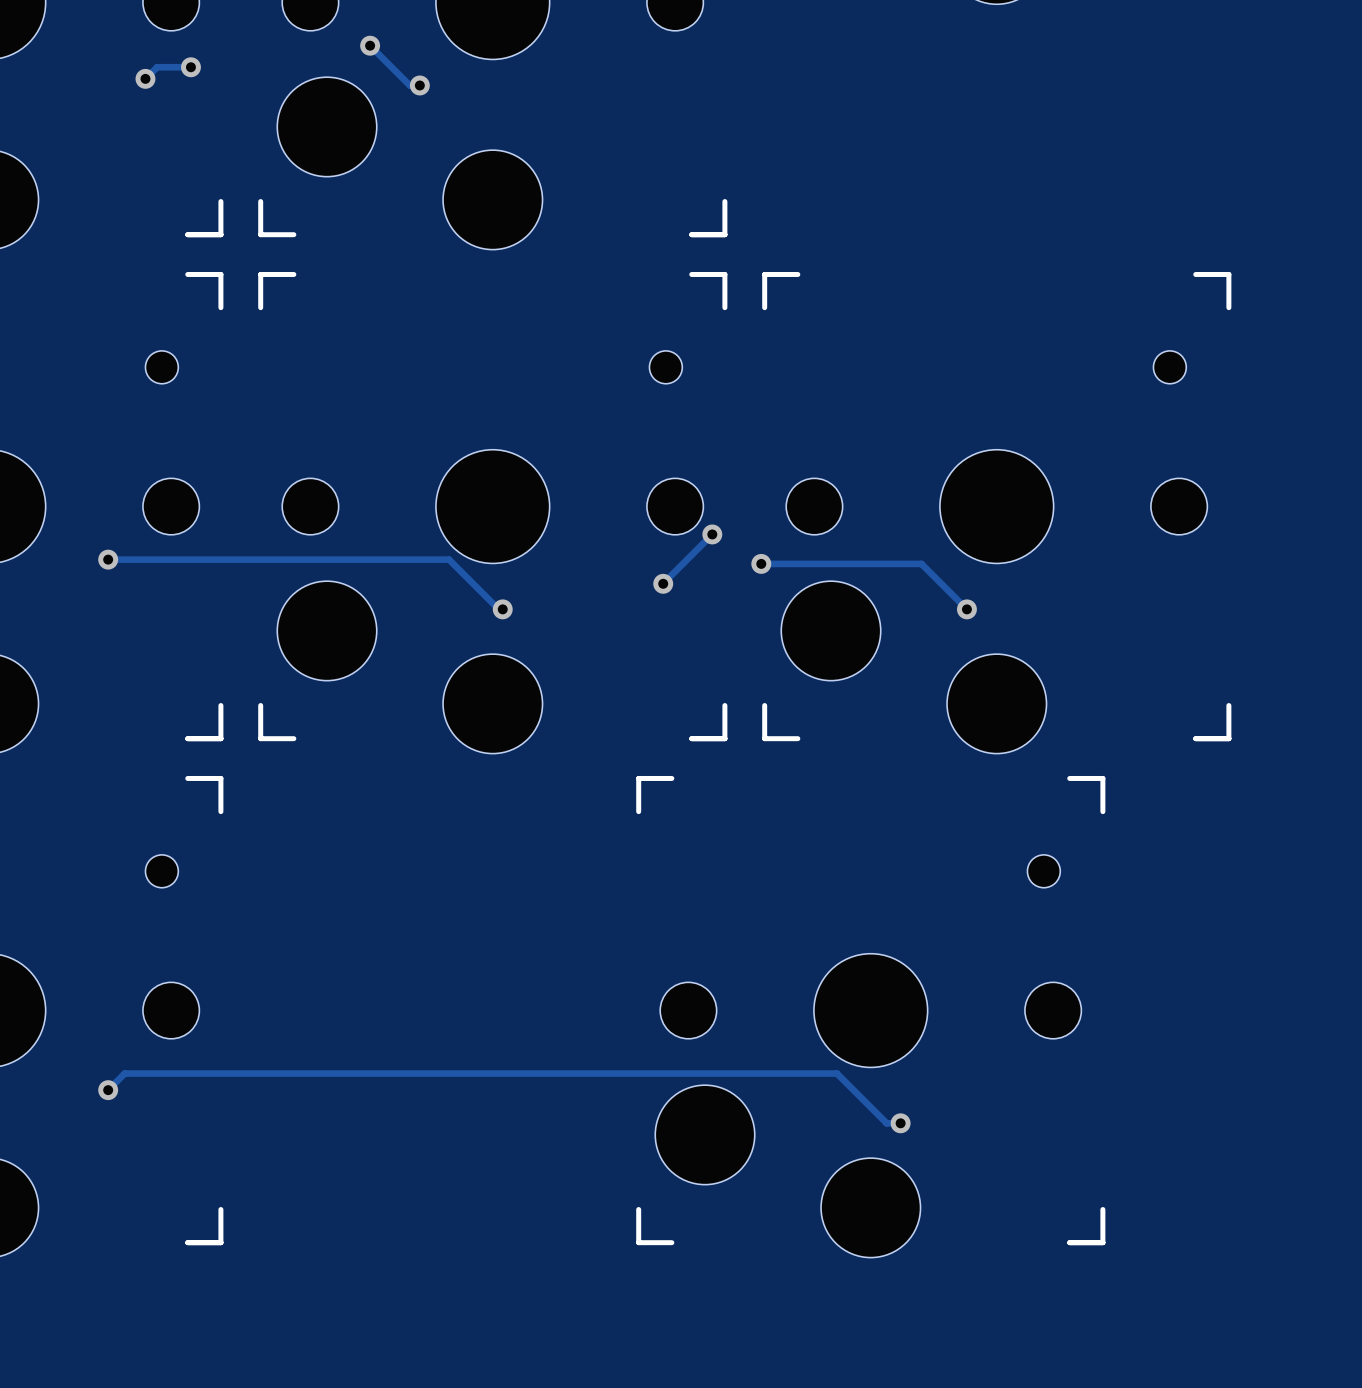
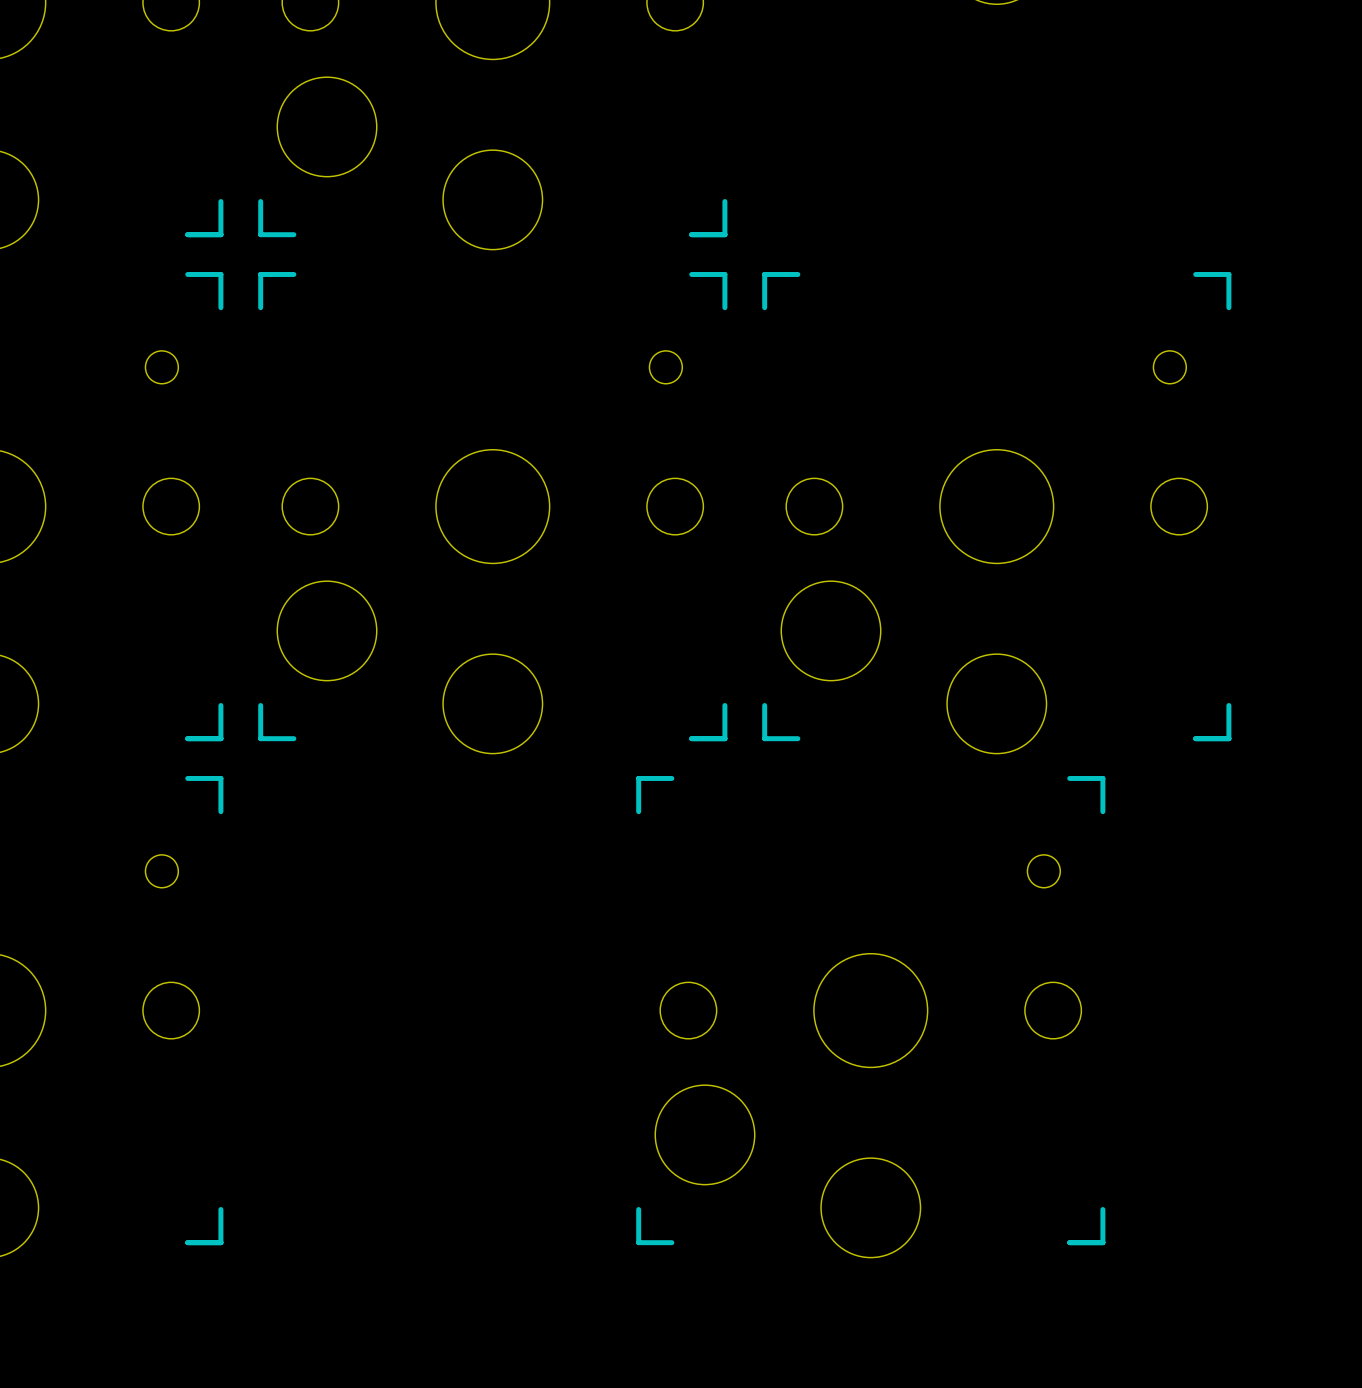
track: (370, 45) (409, 85) (419, 85) -> none
via: (370, 45) -> none
track: (190, 67) (157, 67) (145, 78) -> none
via: (190, 67) -> none
via: (145, 78) -> none
via: (419, 85) -> none
track: (712, 534) (663, 583) -> none
via: (712, 534) -> none
track: (108, 559) (449, 559) (498, 609) (502, 609) -> none
via: (108, 559) -> none
track: (761, 563) (921, 563) (966, 609) -> none
via: (761, 563) -> none
via: (663, 583) -> none
via: (502, 609) -> none
via: (966, 609) -> none
track: (108, 1090) (124, 1073) (836, 1073) (886, 1123) (900, 1123) -> none
via: (108, 1090) -> none
via: (900, 1123) -> none

